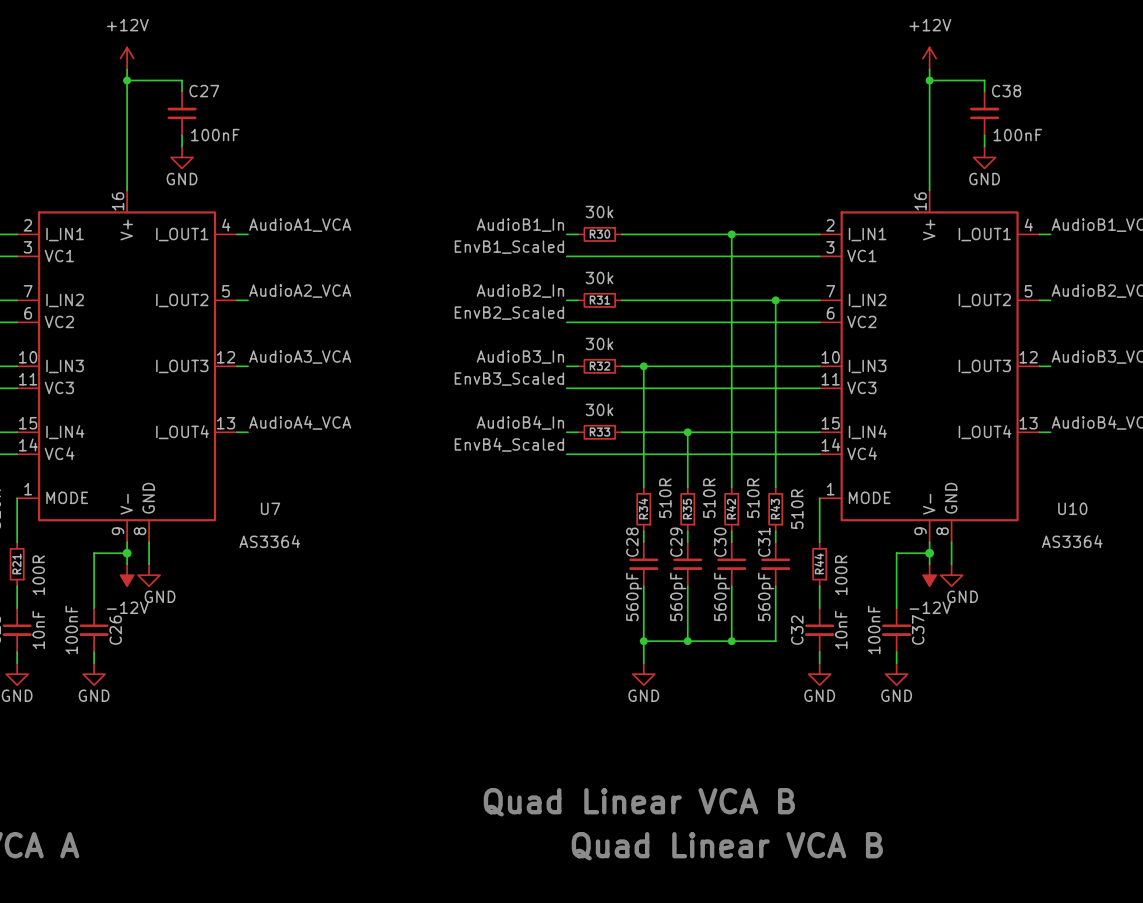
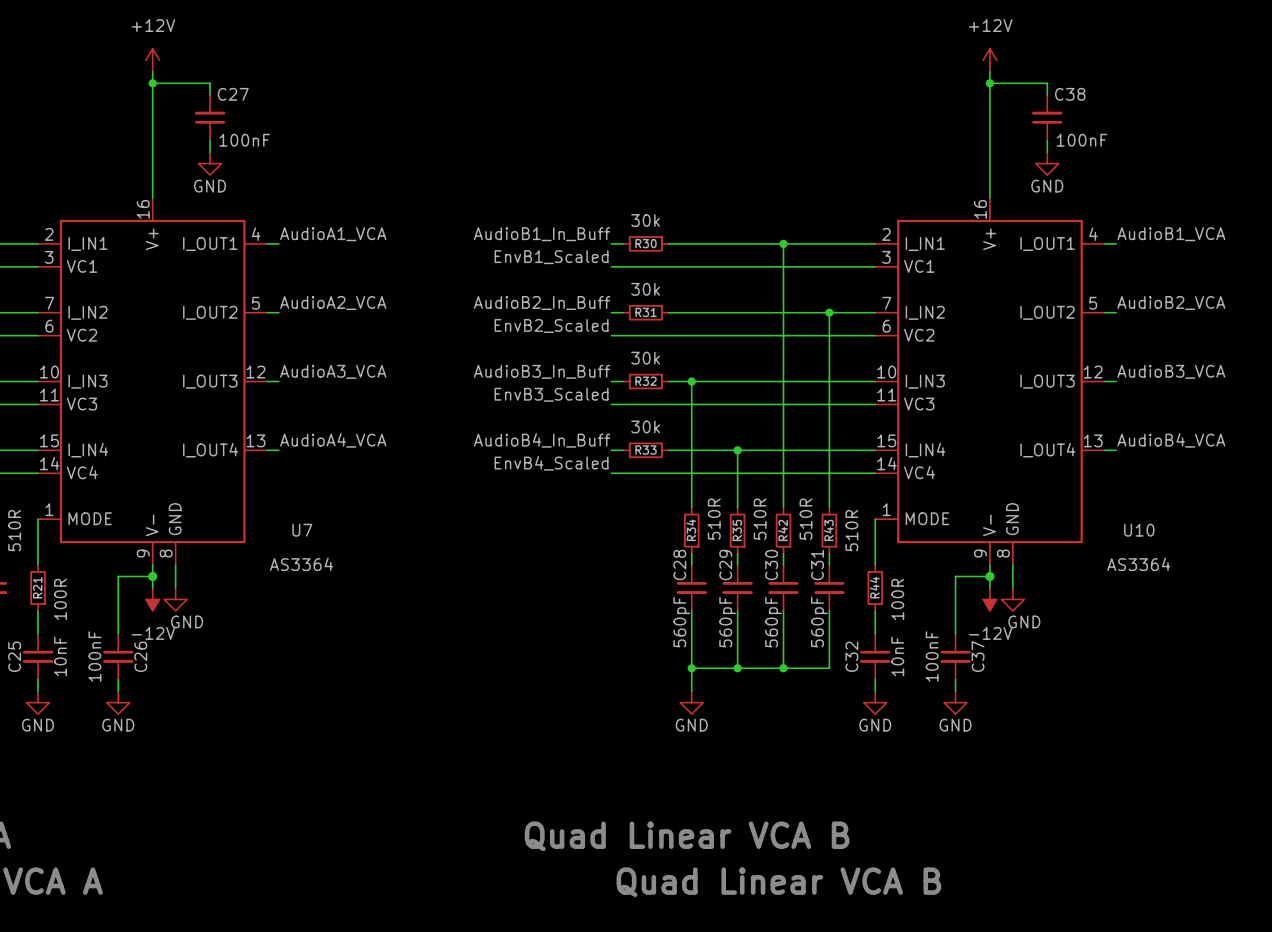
label: AudioB1_In (520, 225) -> AudioB1_In_Buff (542, 234)
label: AudioB2_In (520, 291) -> AudioB2_In_Buff (542, 303)
label: AudioB3_In (520, 357) -> AudioB3_In_Buff (542, 371)
label: AudioB4_In (520, 422) -> AudioB4_In_Buff (542, 440)

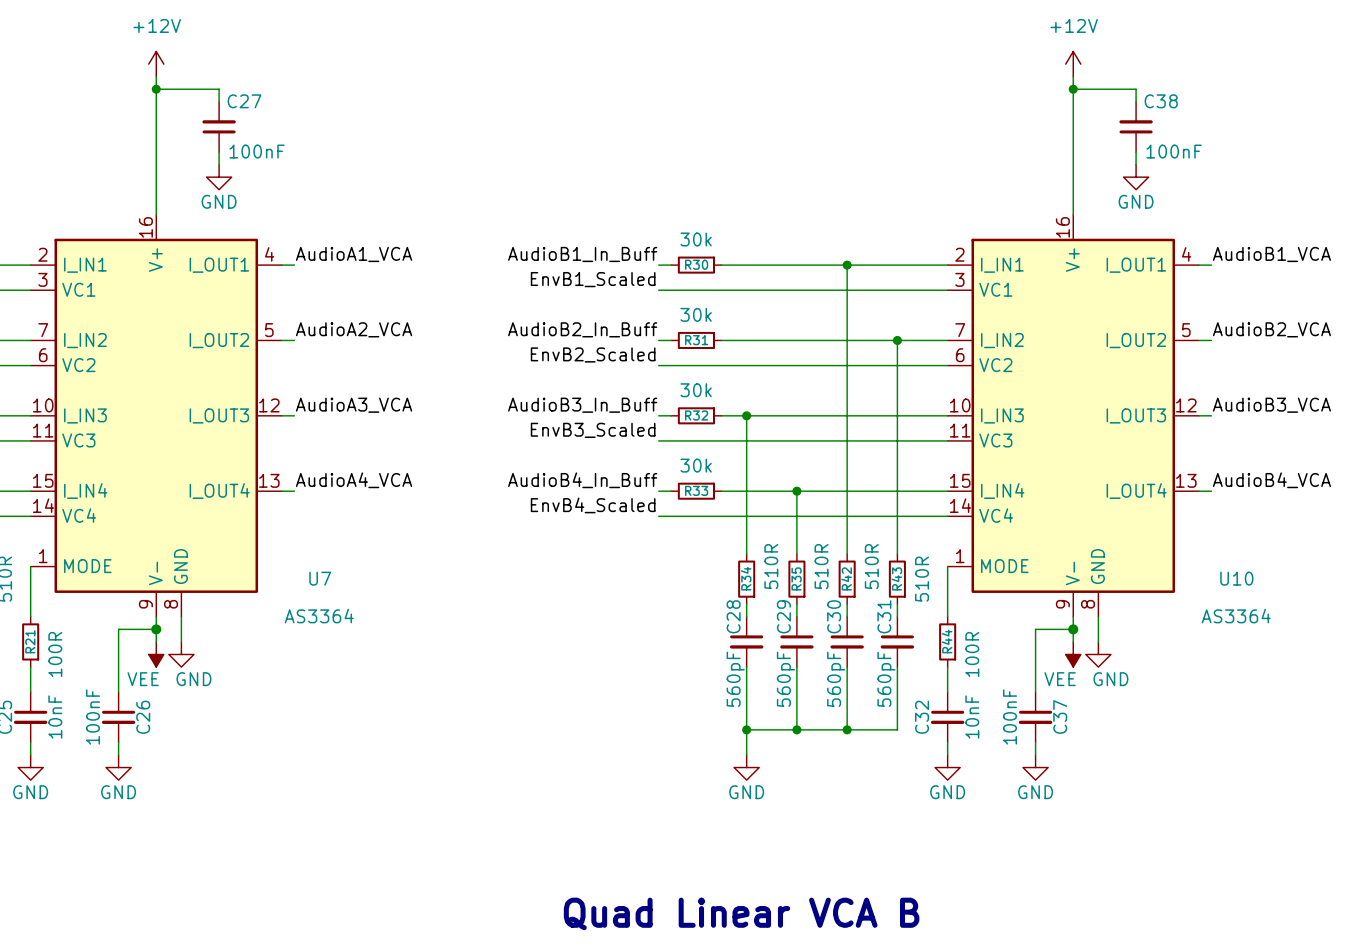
power symbol: -12V (152, 599) -> VEE (156, 654)
power symbol: -12V (989, 599) -> VEE (1073, 654)

